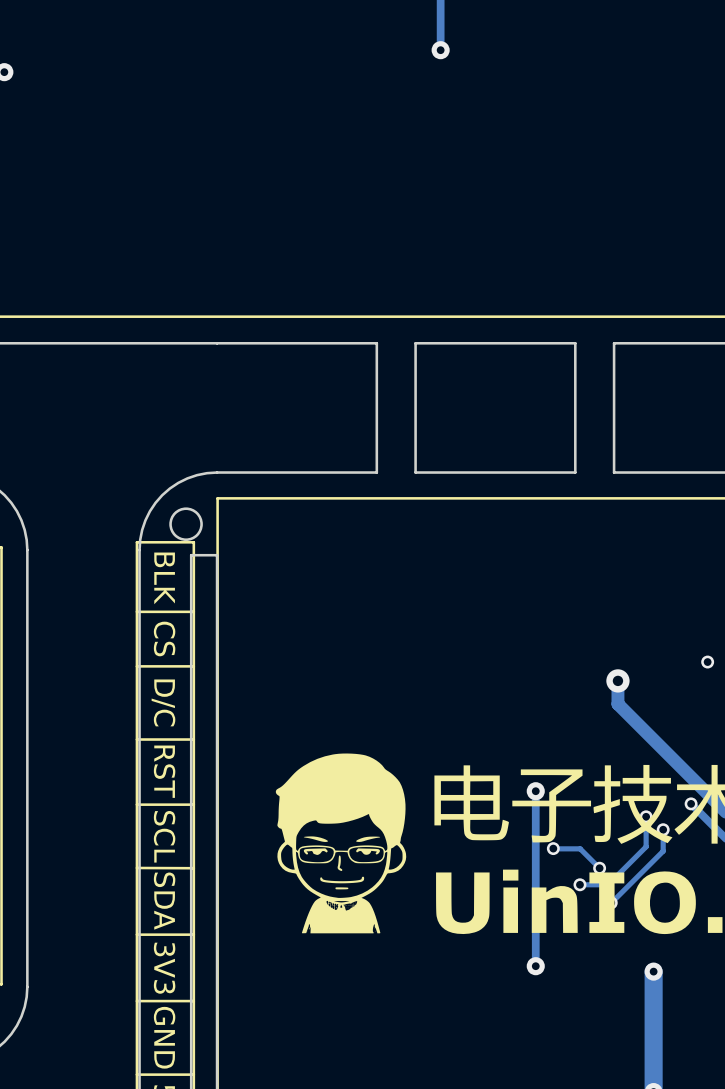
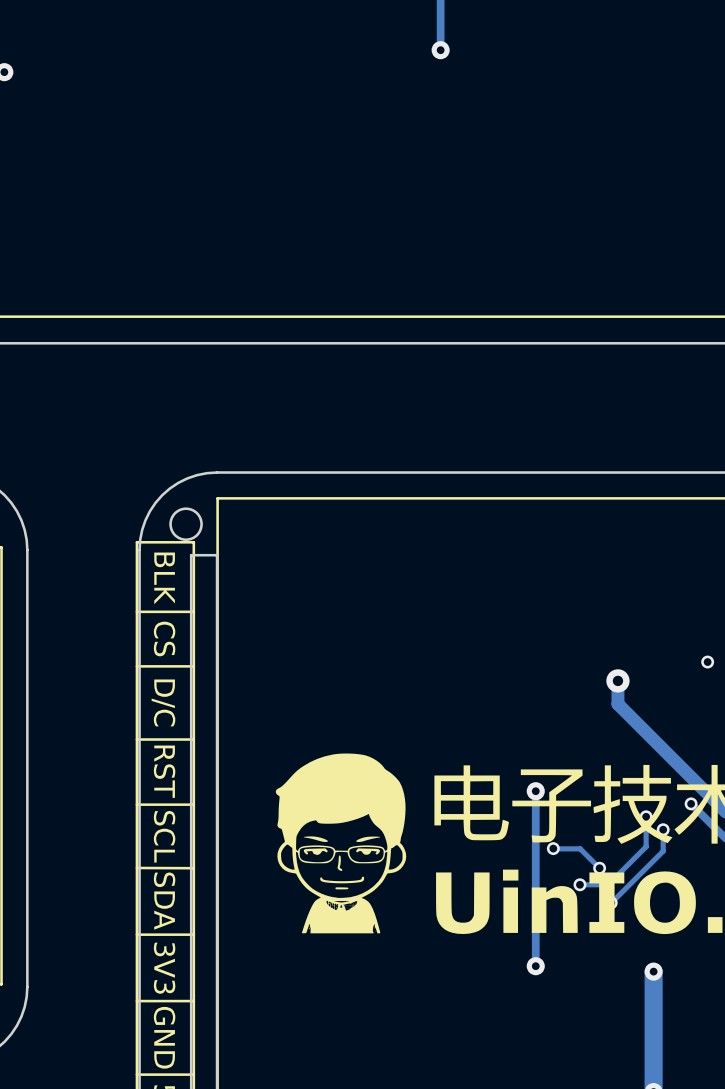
board edge: (376, 343) (376, 472) -> (415, 472) (376, 472)
board edge: (415, 343) (415, 472) -> (415, 343) (376, 343)
board edge: (575, 343) (575, 472) -> (614, 472) (575, 472)
board edge: (614, 343) (614, 472) -> (614, 343) (575, 343)

